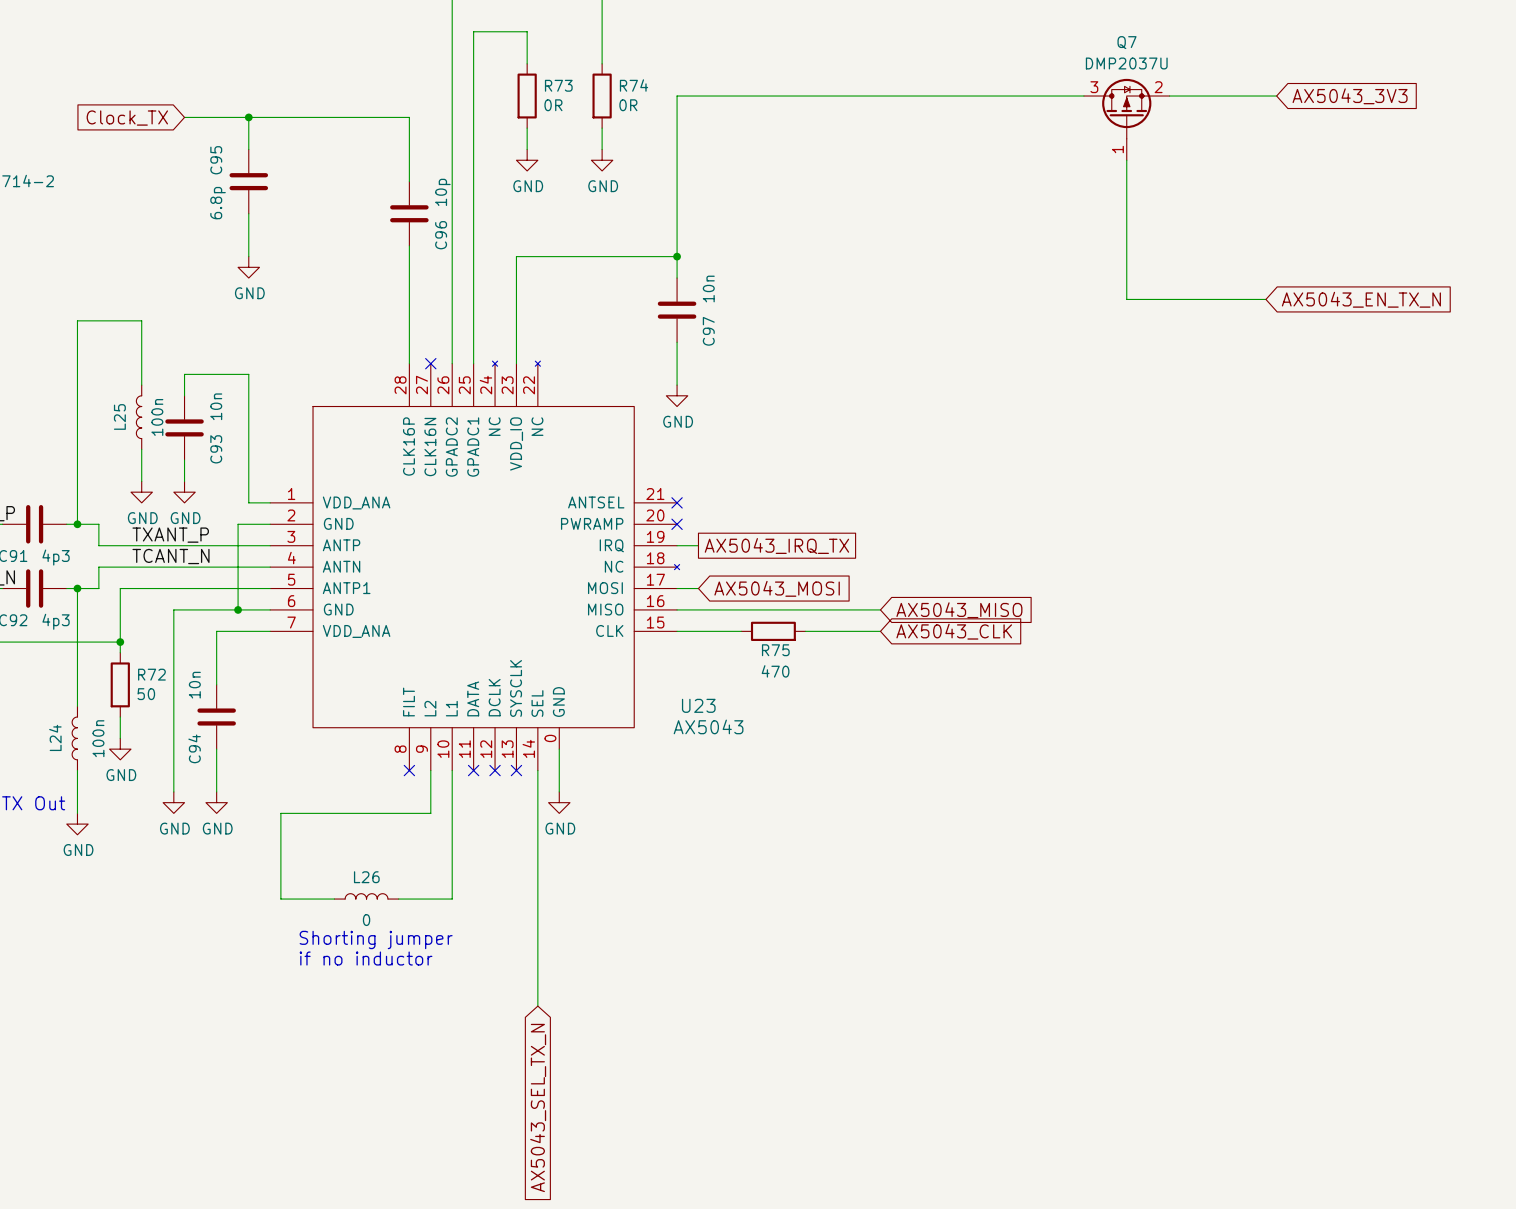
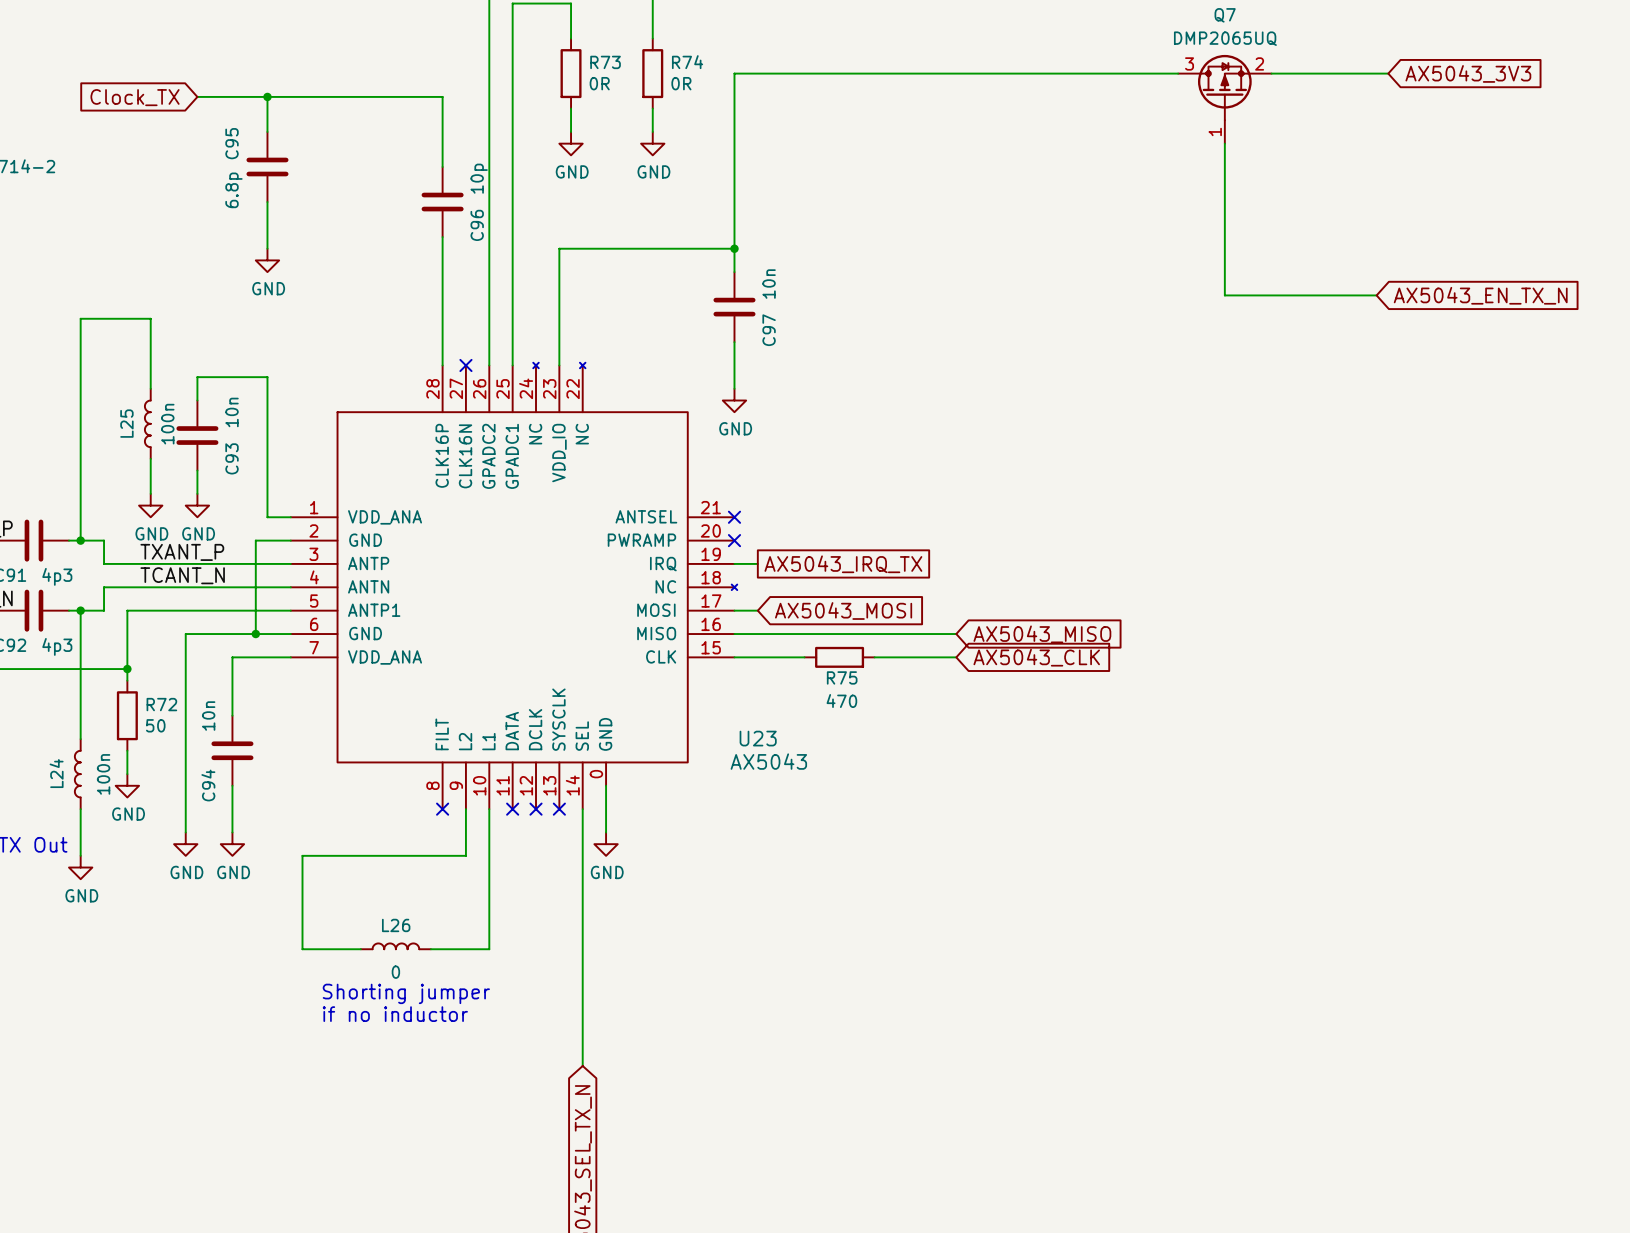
Q7 value: DMP2037U (1126, 63) -> DMP2065UQ (1225, 38)

